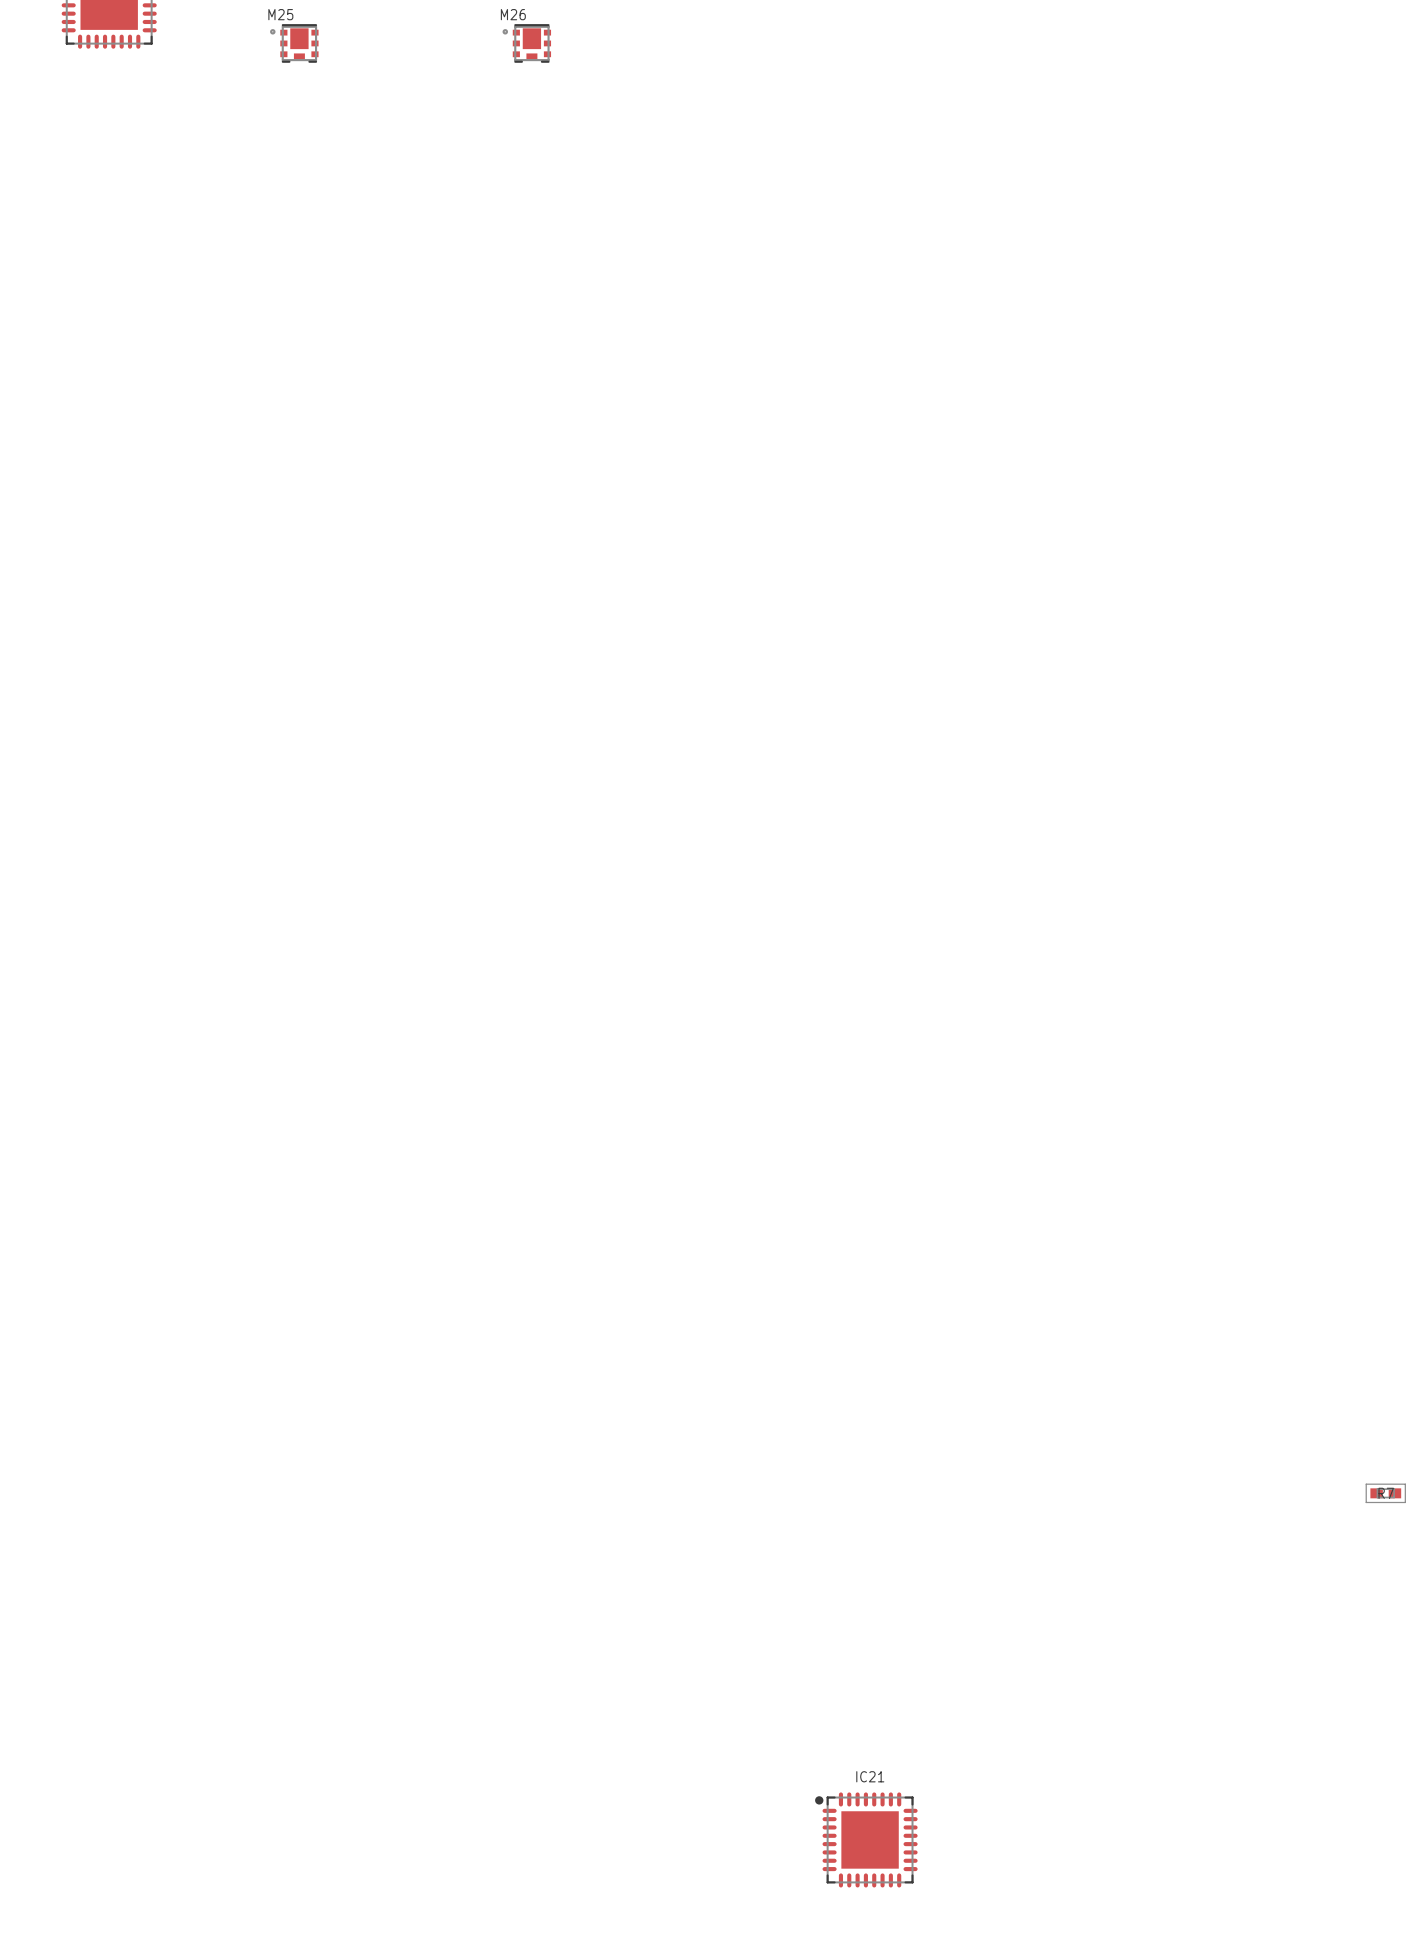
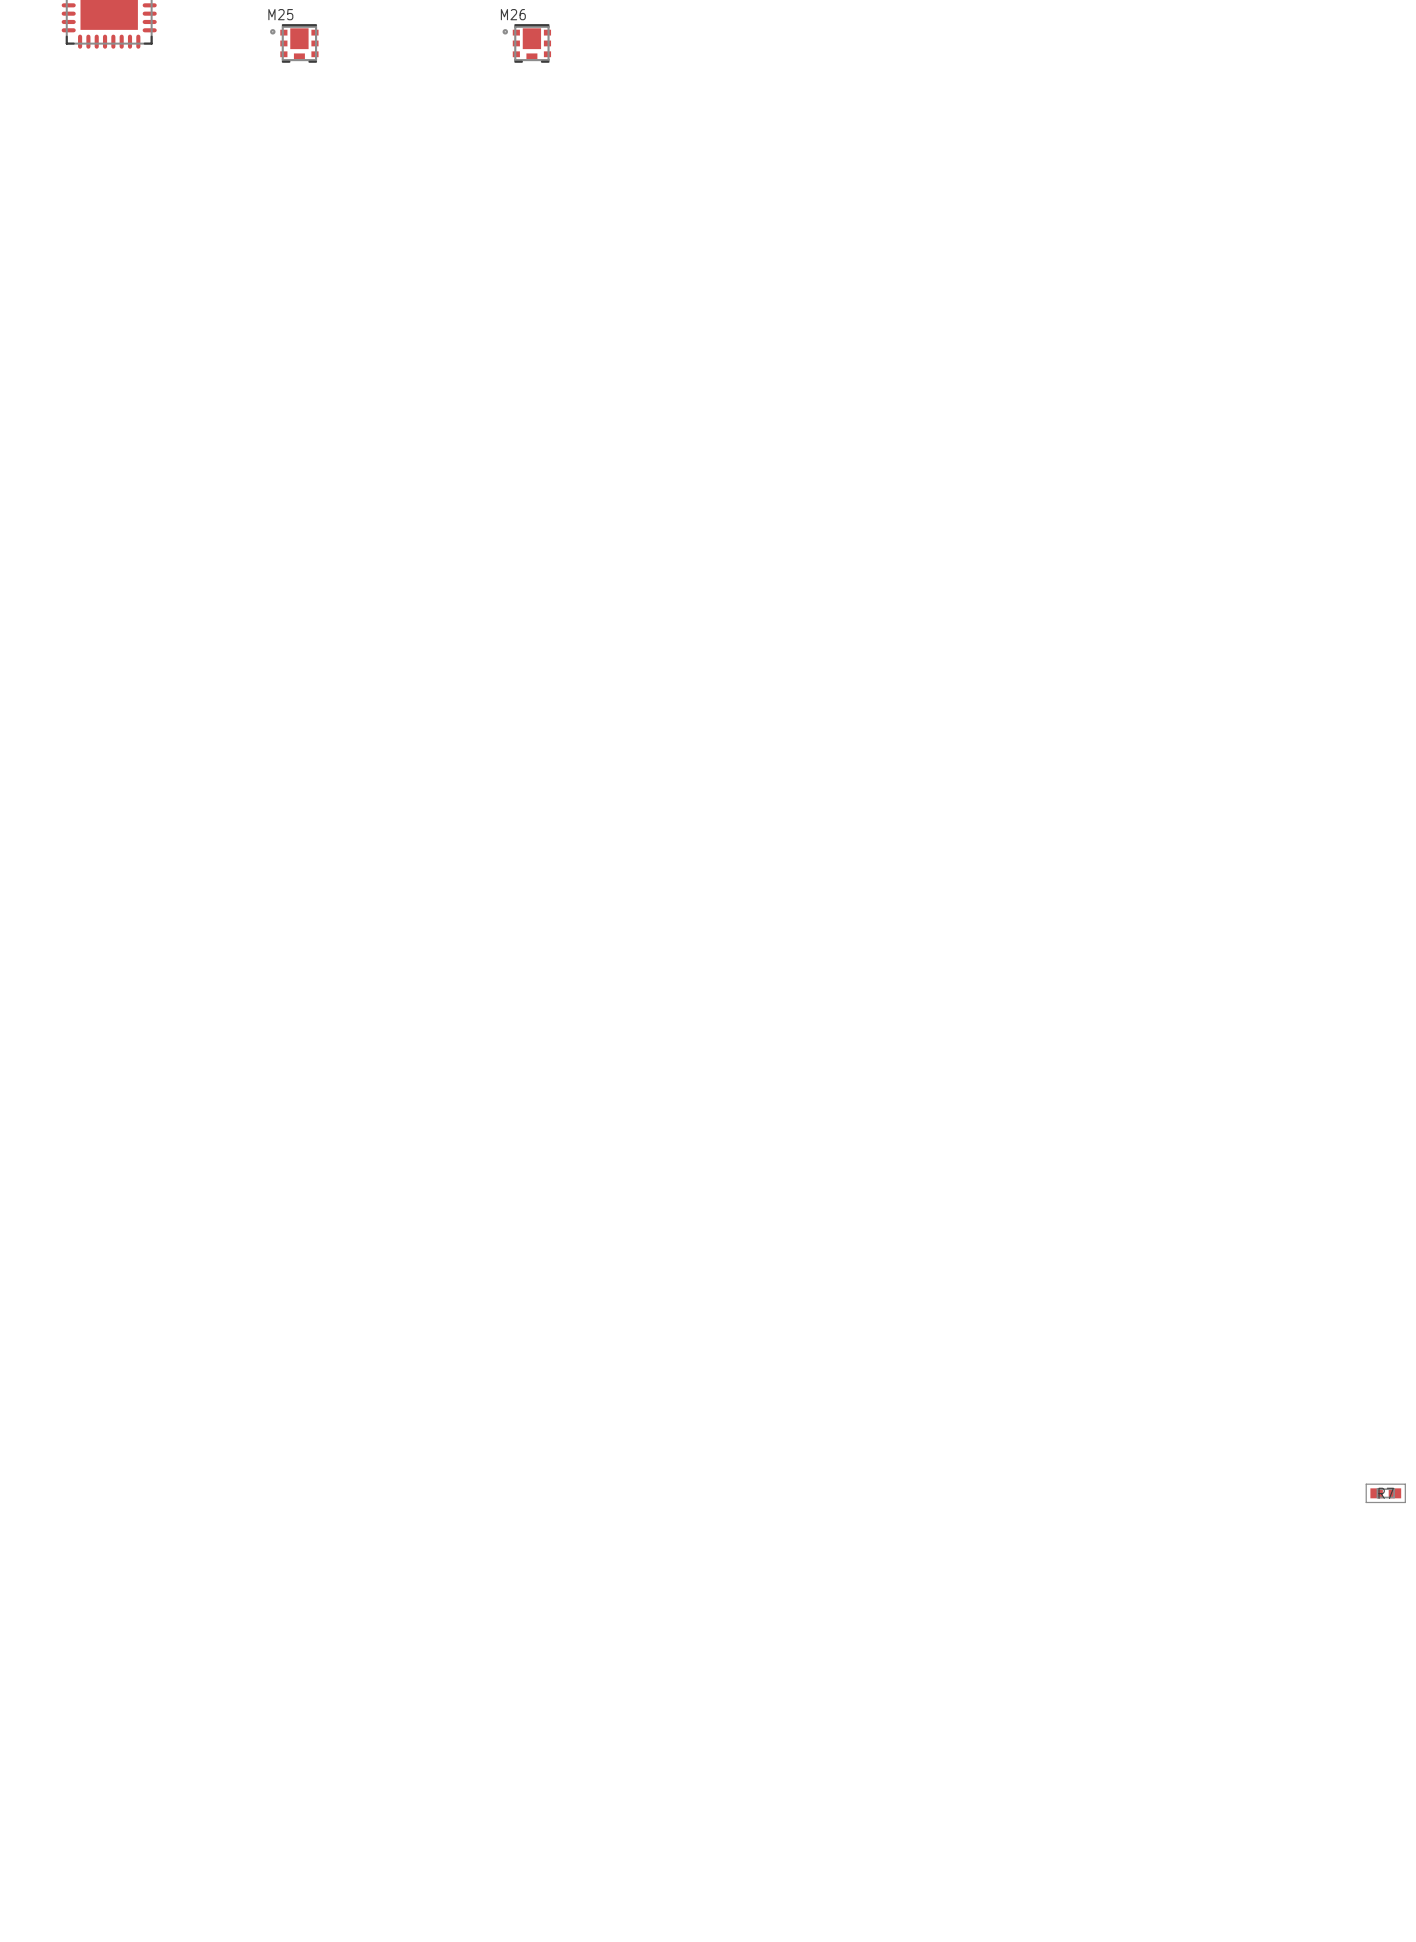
IC21: (866, 1839) -> none

